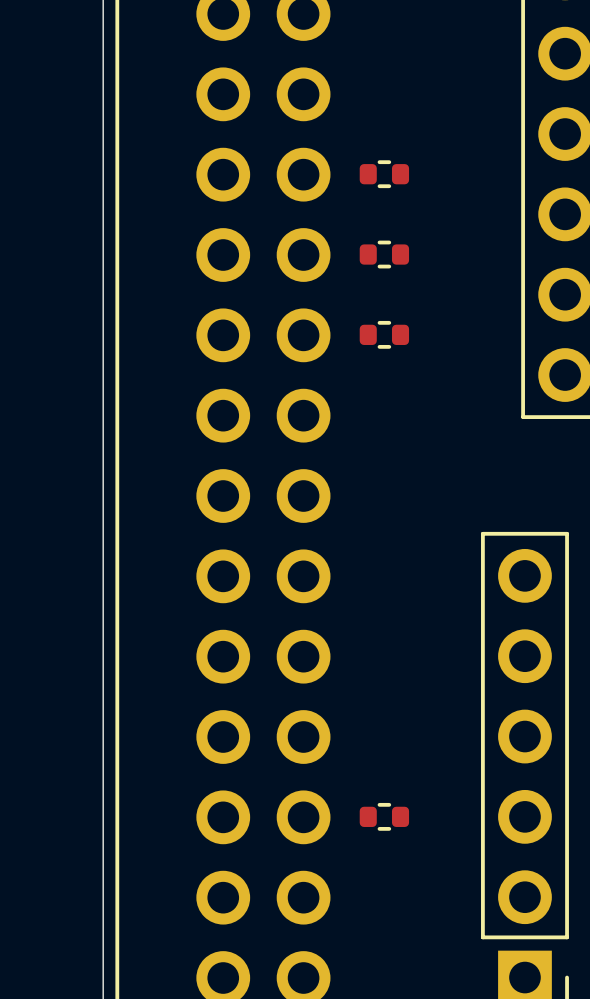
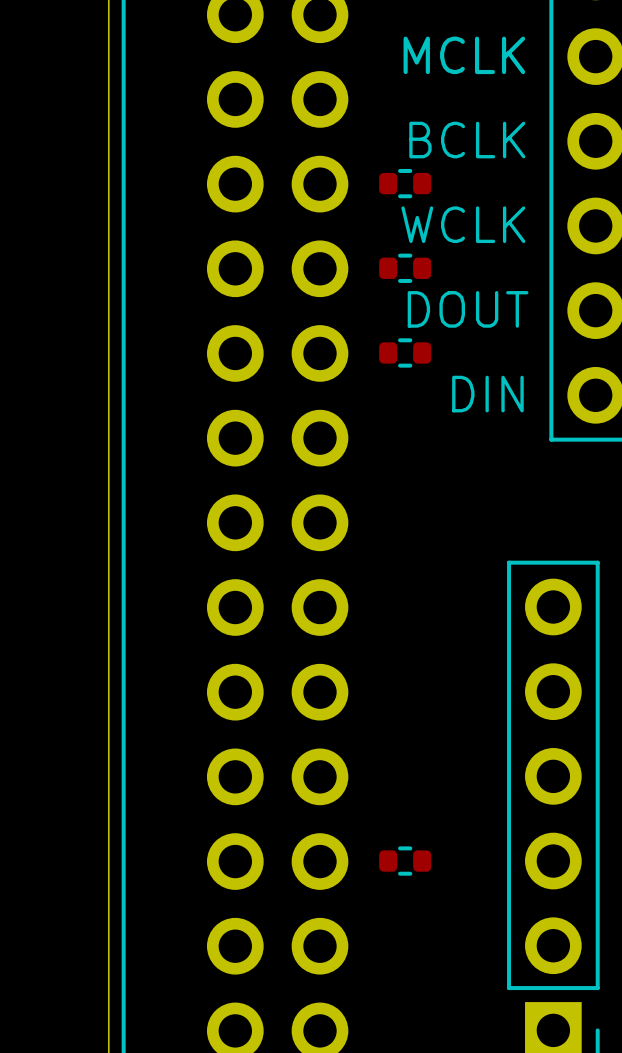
text: none -> MCLK (464, 55)
text: none -> BCLK (467, 140)
text: none -> WCLK (463, 224)
text: none -> DOUT (468, 309)
text: none -> DIN (487, 394)

